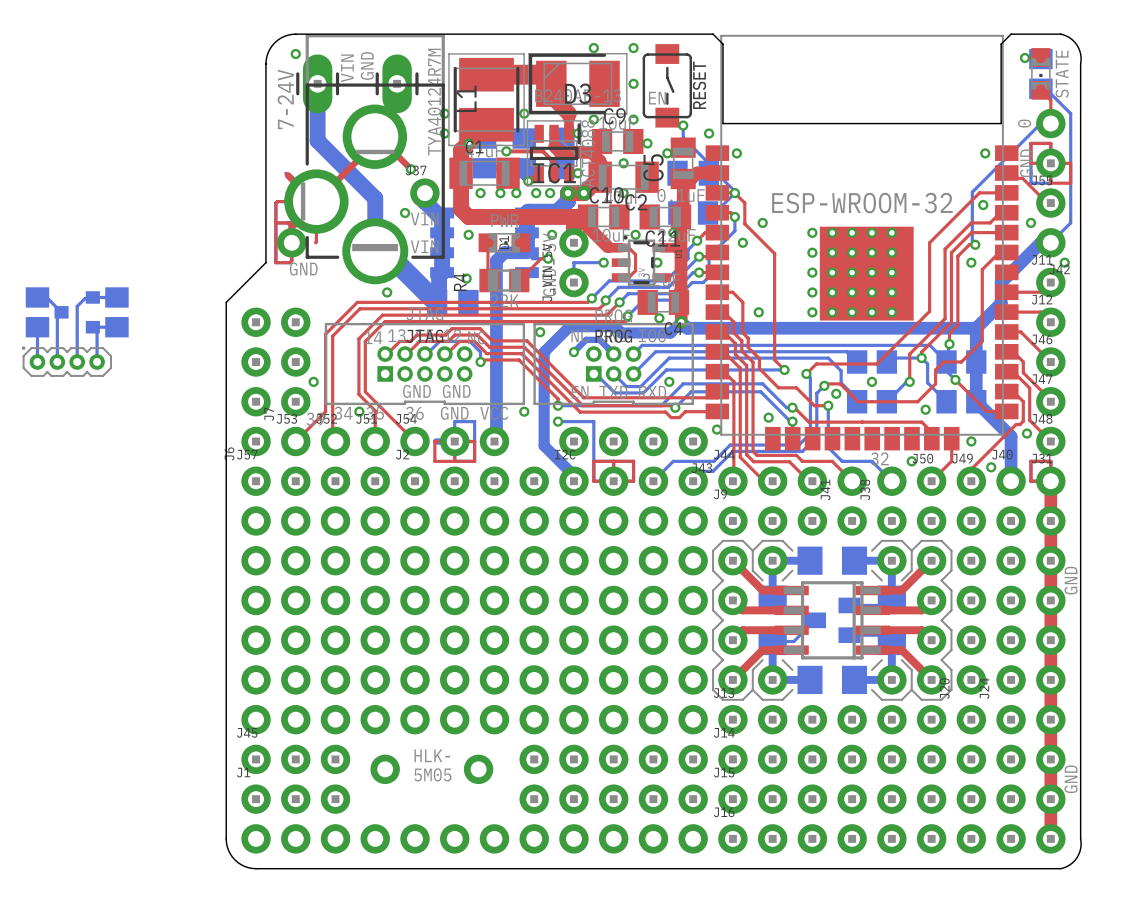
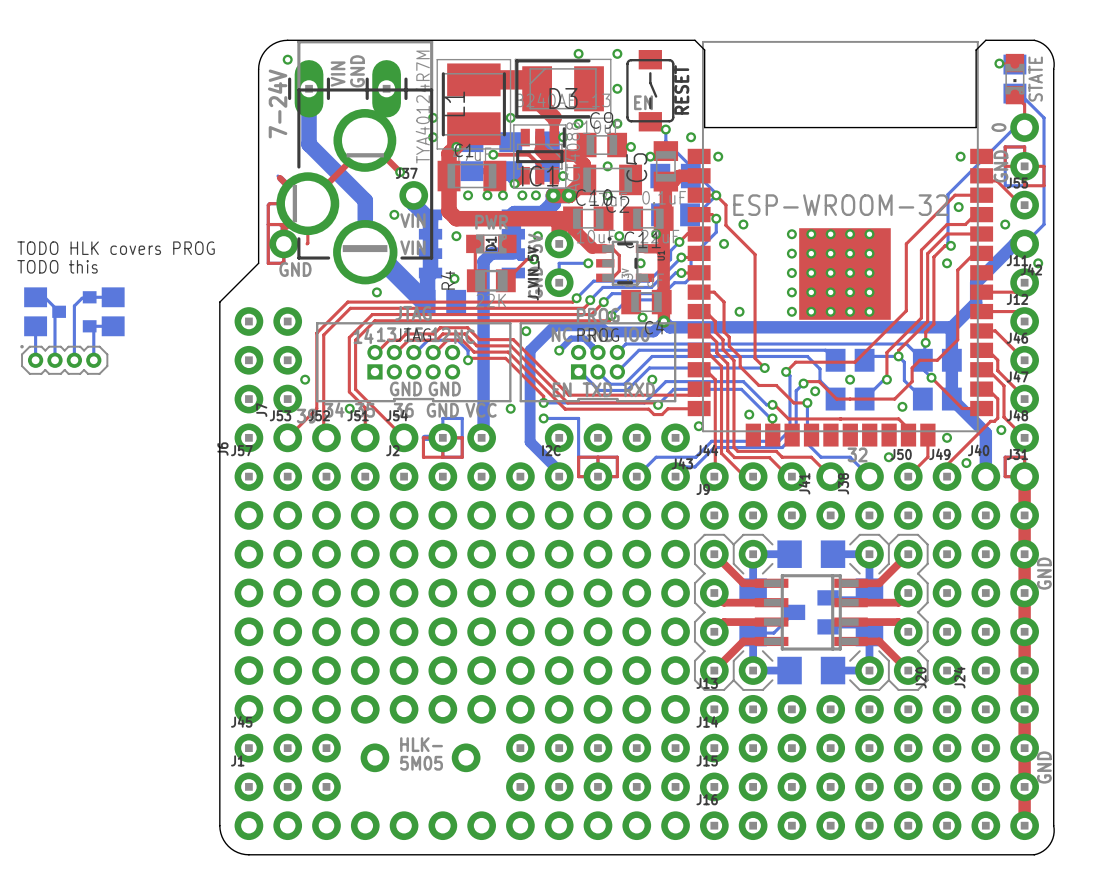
text: none -> TODO HLK covers PROG (116, 248)
text: none -> TODO this (57, 266)

